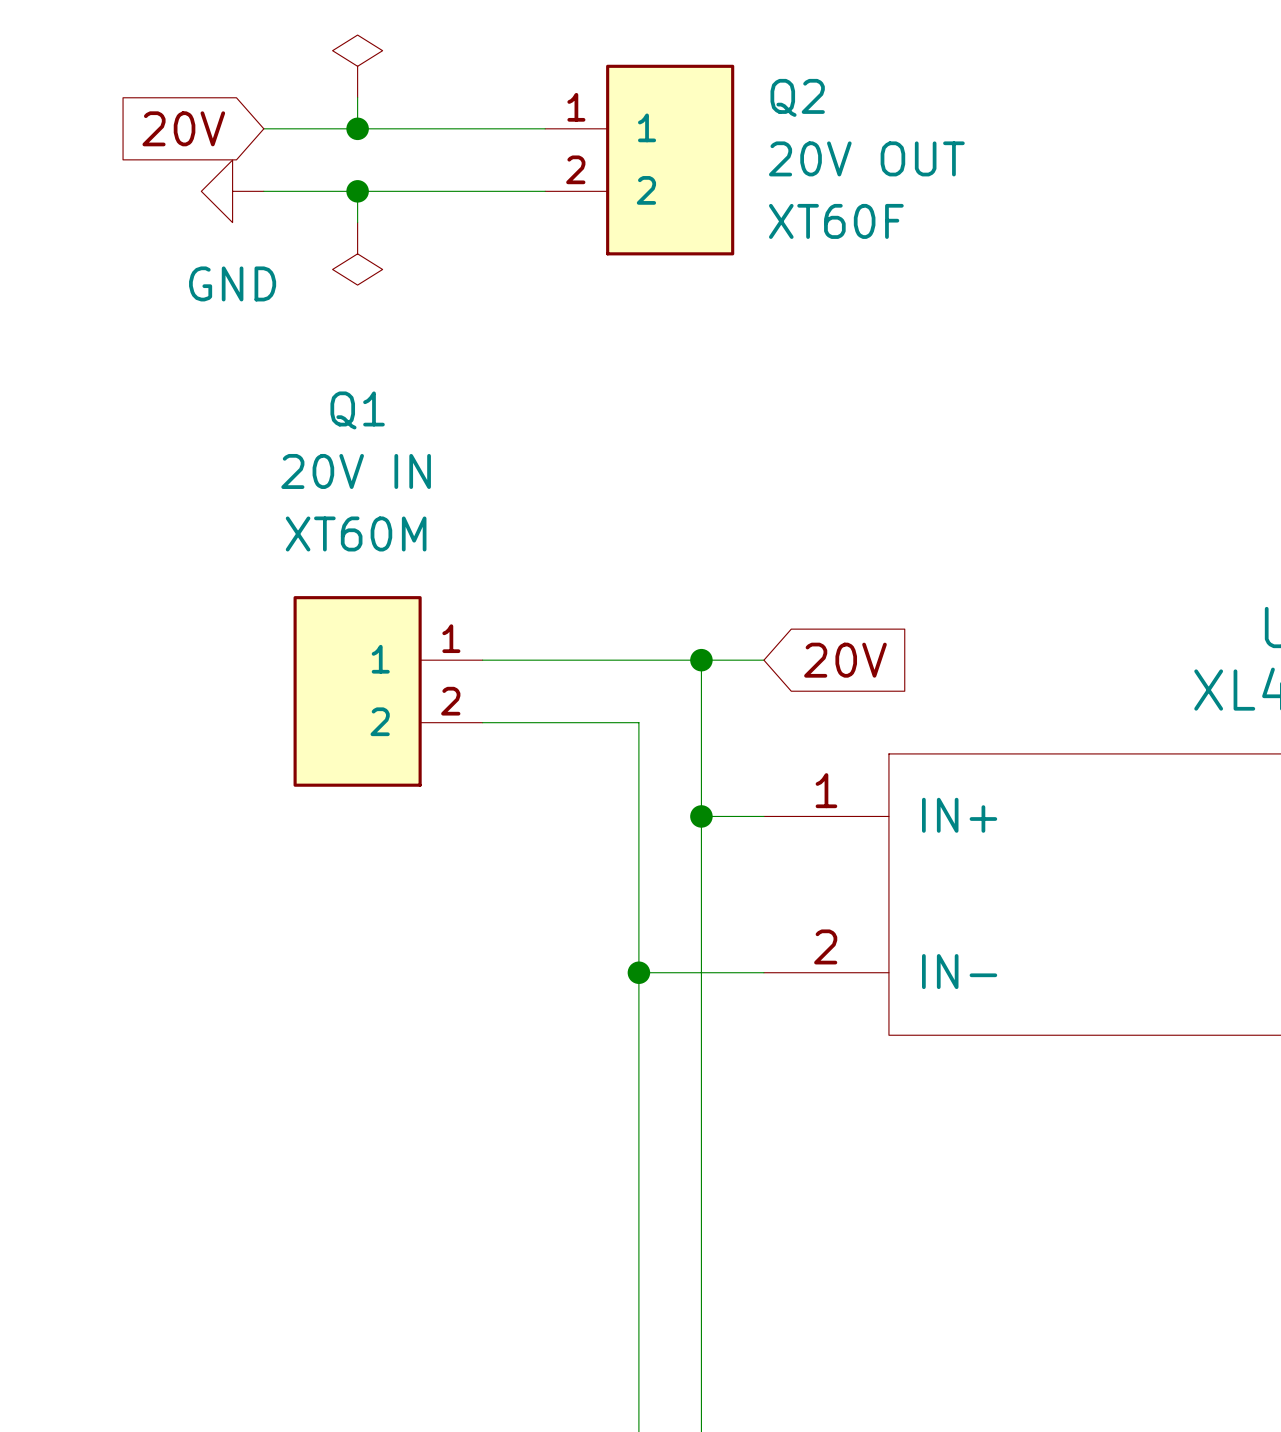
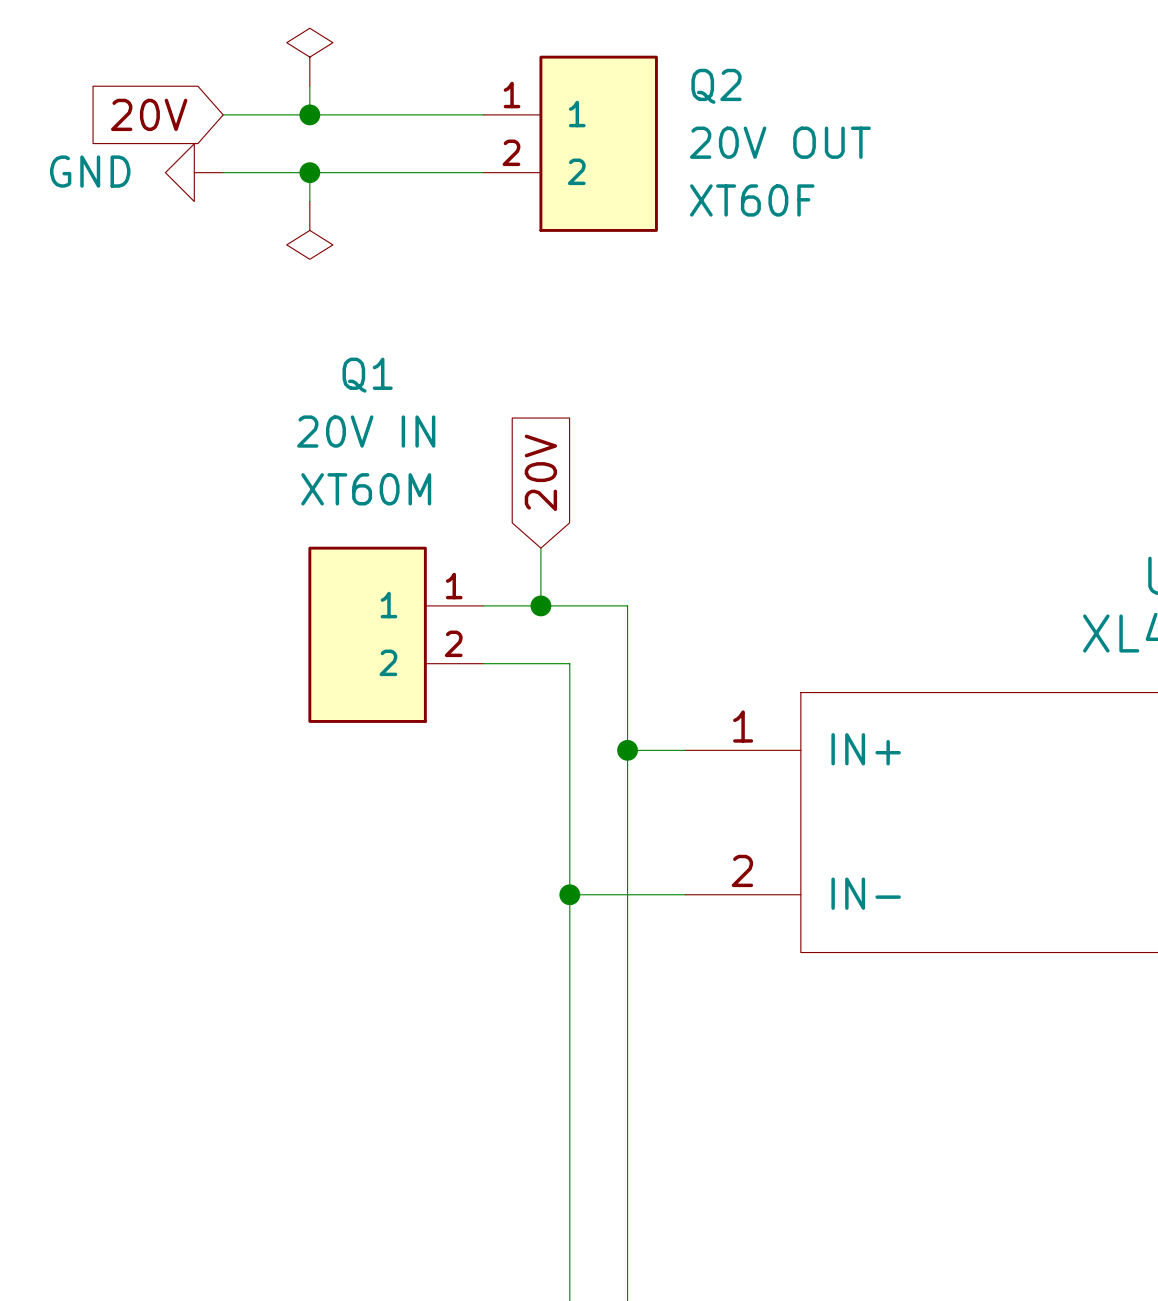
power symbol text position: GND (232, 283) -> GND (90, 171)
wire: none -> (540, 548) (540, 605)
wire: (701, 660) (763, 660) -> none
junction position: (701, 660) -> (540, 605)
global label rotation: 0° (845, 660) -> 90° counterclockwise (540, 472)
global label position: 20V (845, 660) -> 20V (540, 472)
Q1 position: (388, 691) -> (395, 634)

